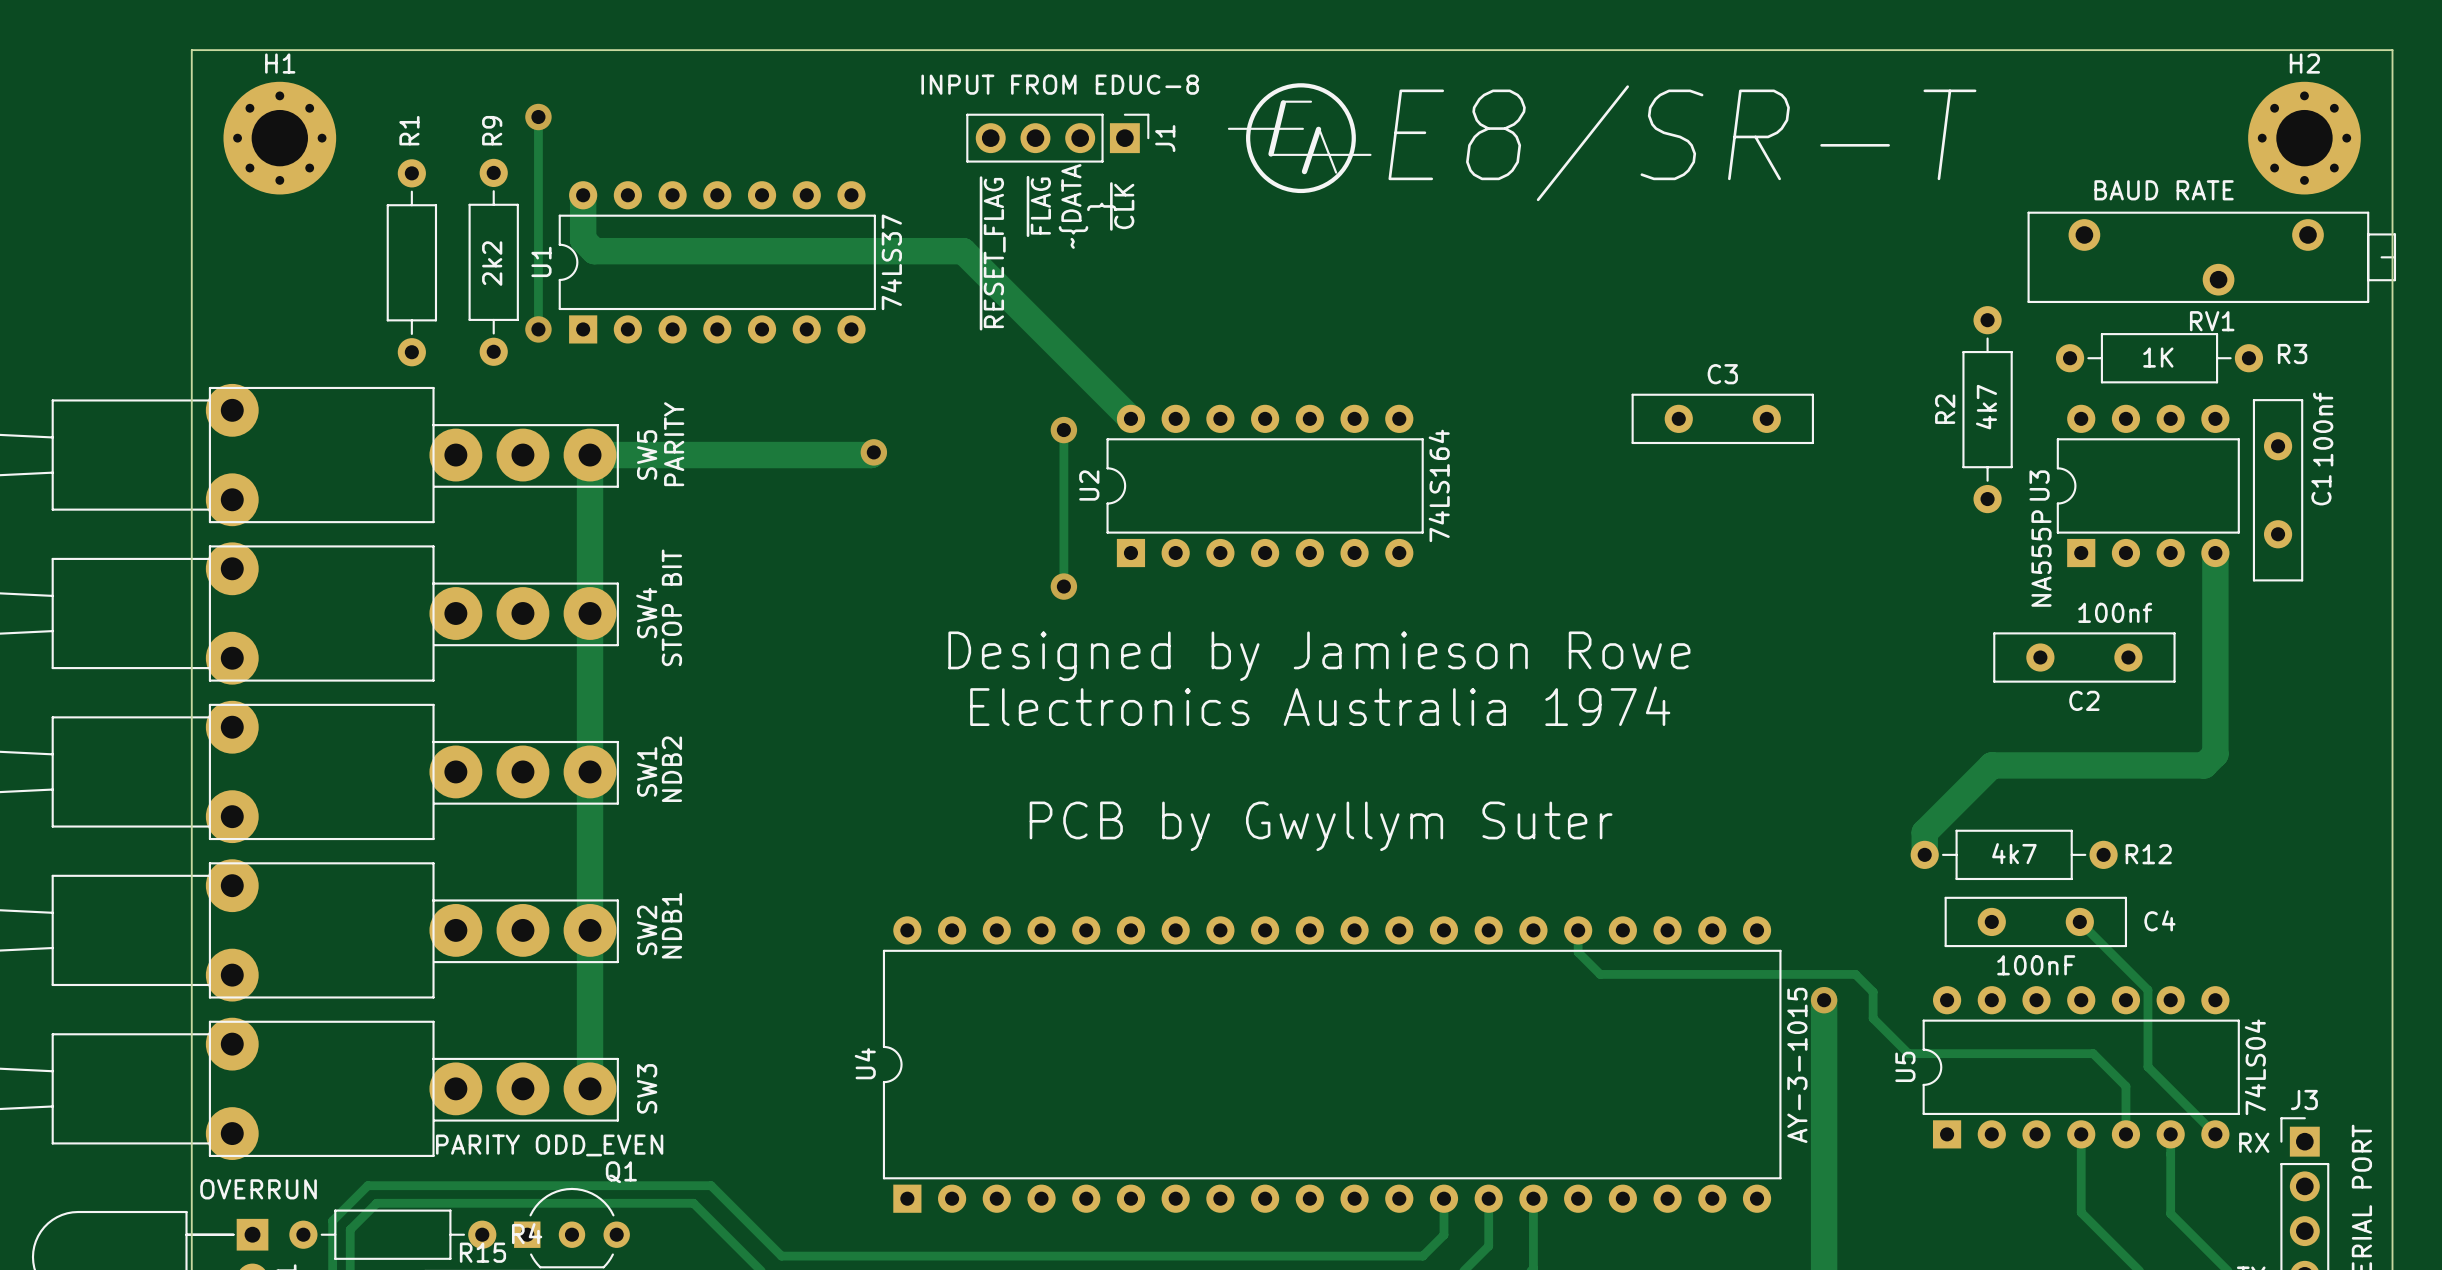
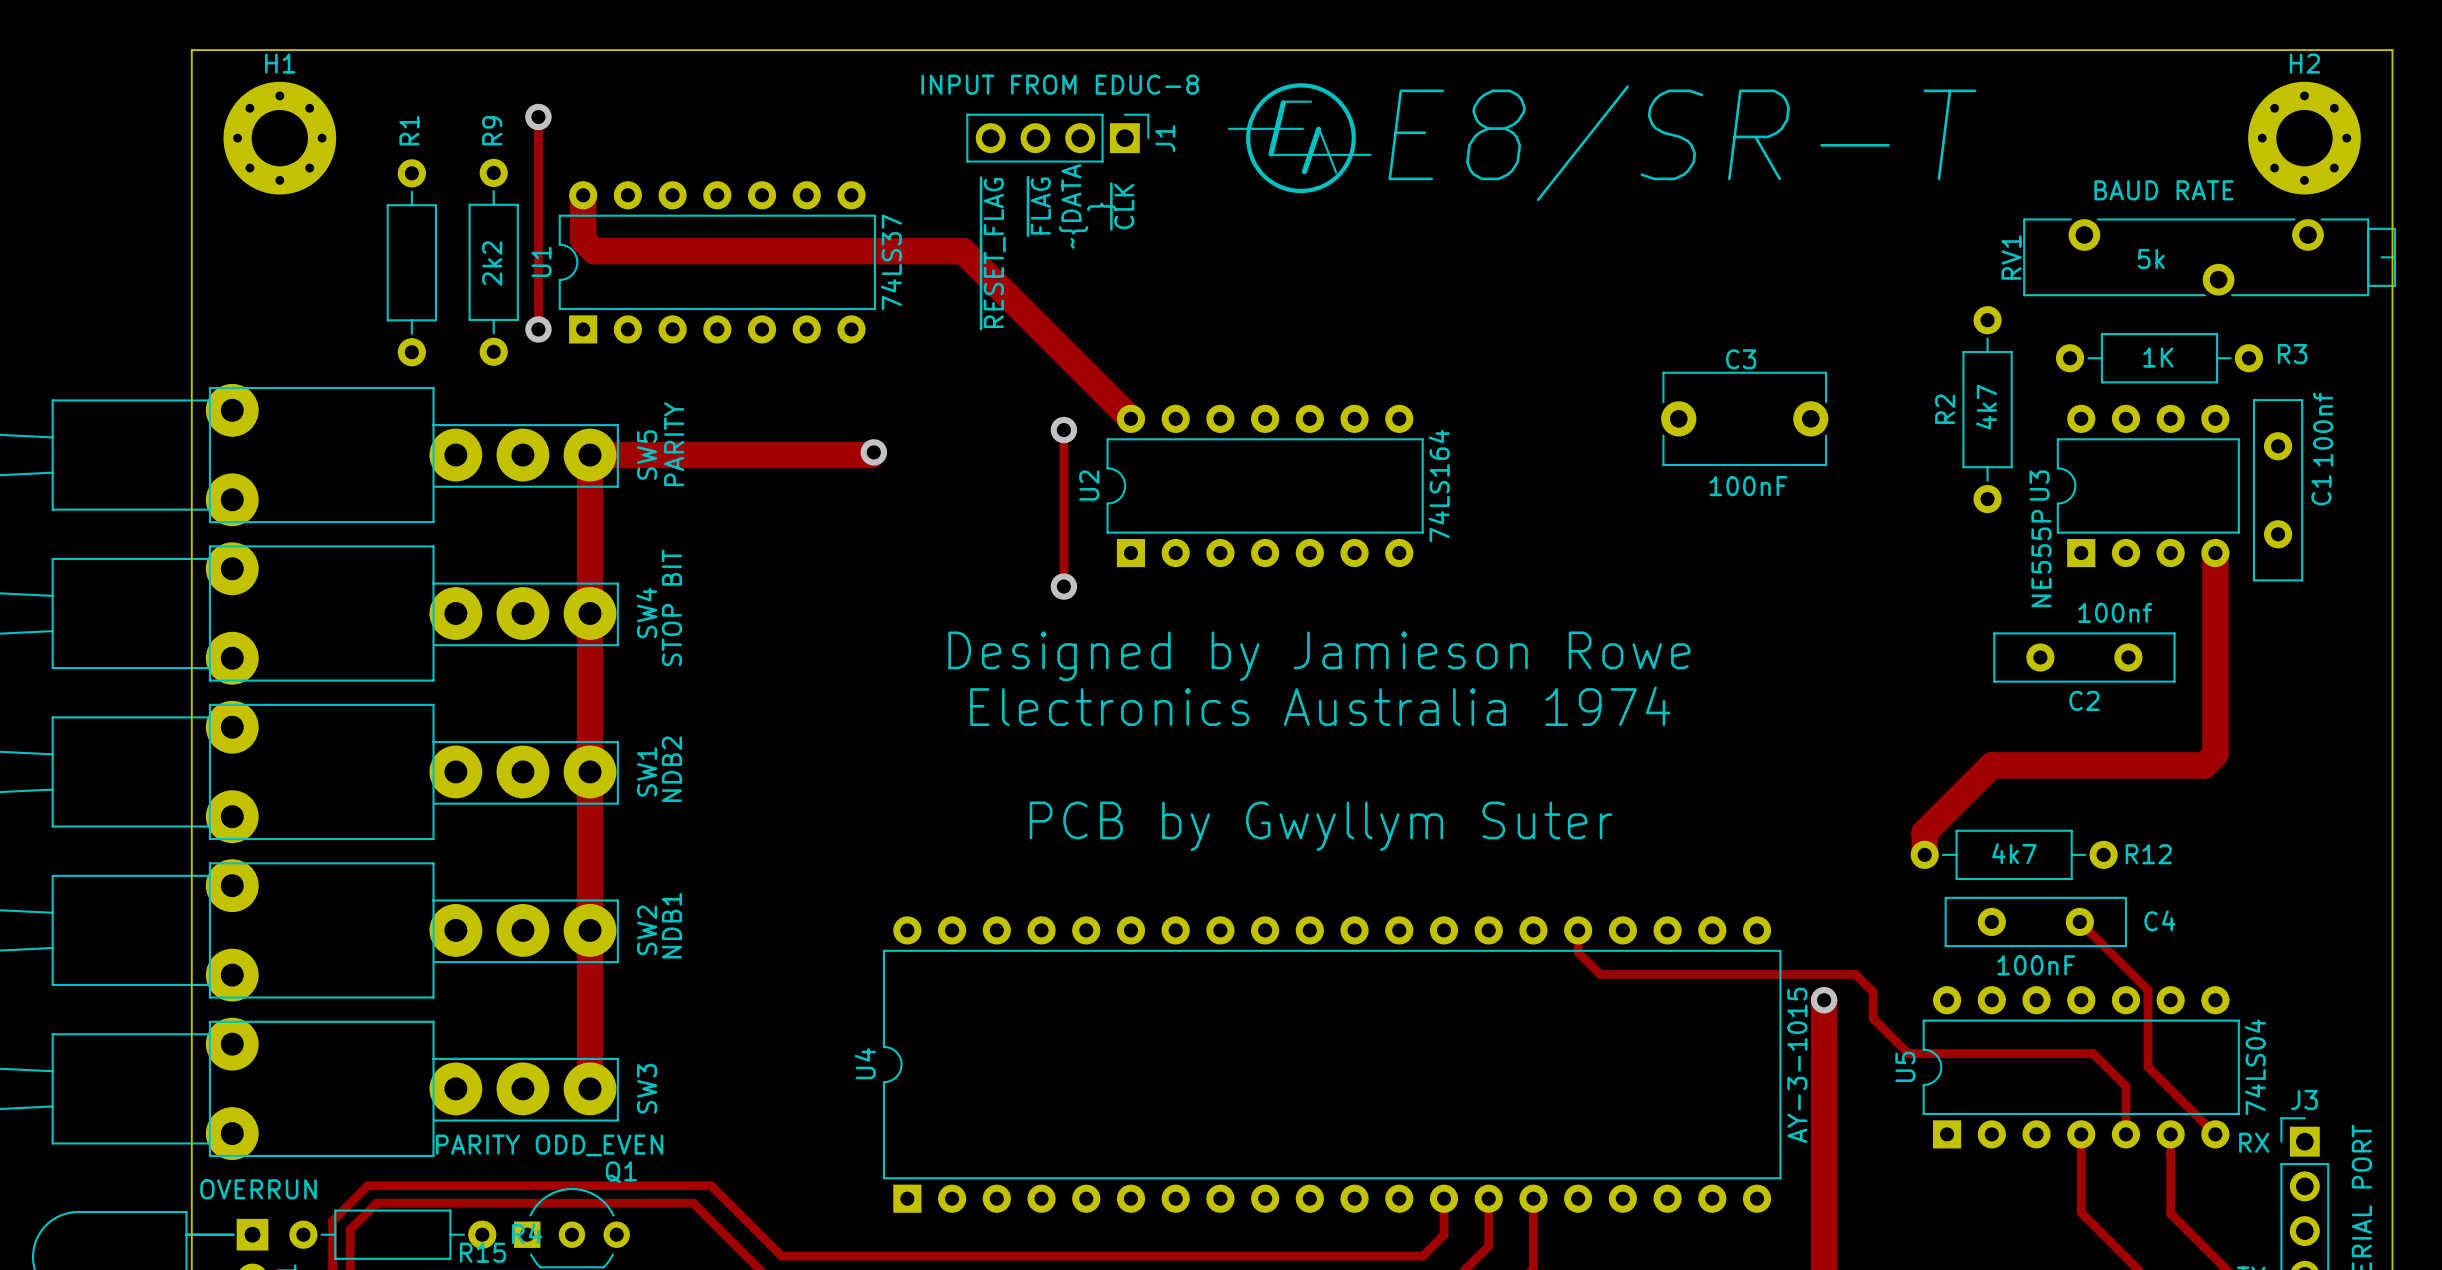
RV1 footprint: [2027, 211, 2397, 304] -> [2023, 218, 2397, 297]
RV1 value: none -> 5k (2151, 258)
RV1 name rotation: 0° (2212, 321) -> 90° counterclockwise (2011, 257)
RV1 name position: RV1 (2212, 321) -> RV1 (2011, 257)
C3 footprint: [1631, 393, 1814, 445] -> [1661, 371, 1829, 467]
C3 value: none -> 100nF (1748, 486)
U3 value: NA555P (2041, 558) -> NE555P (2041, 558)

